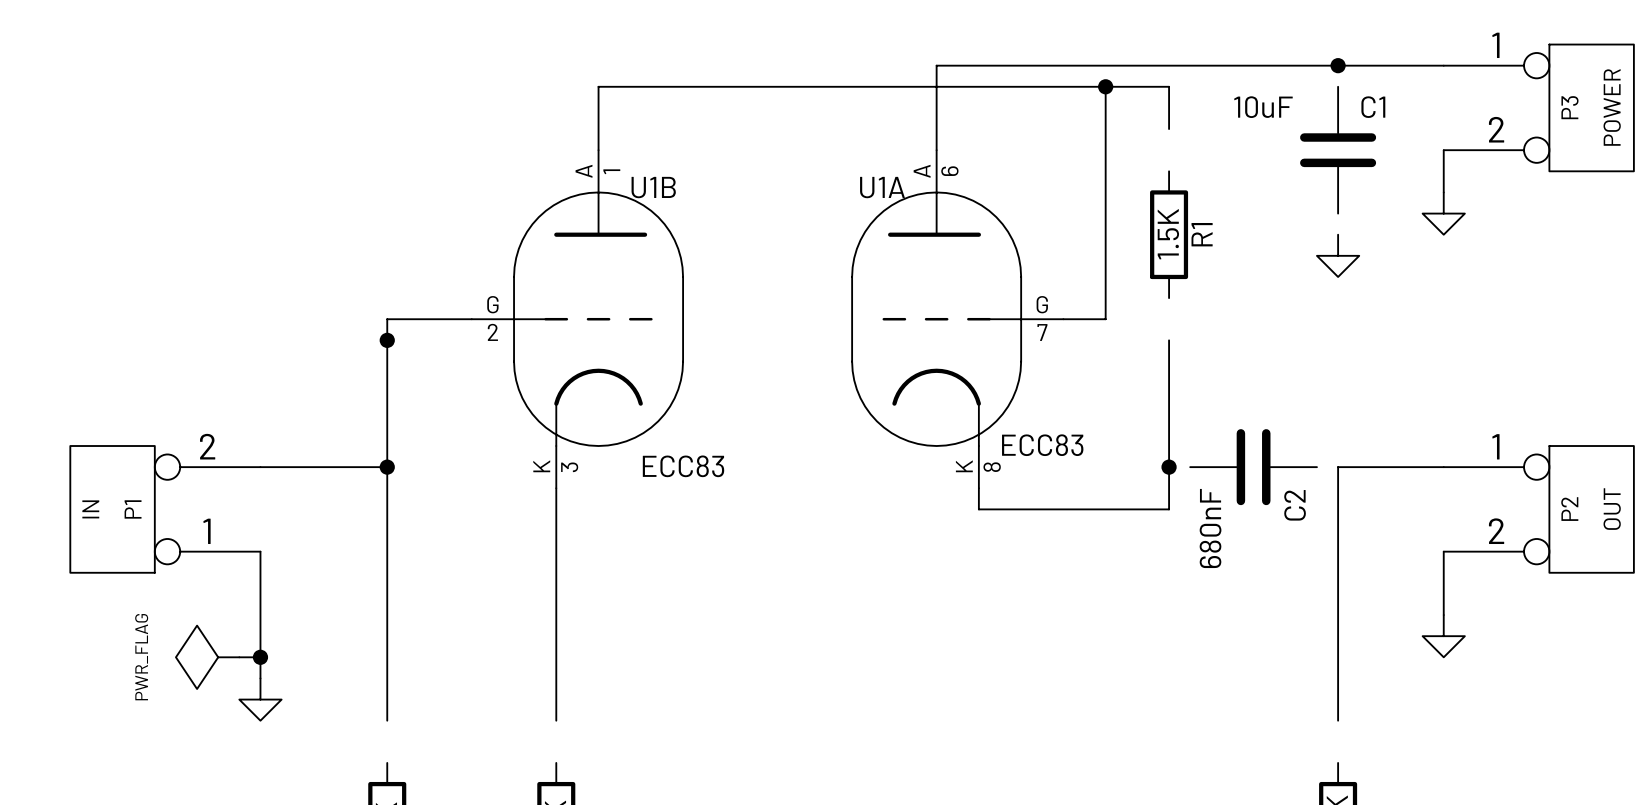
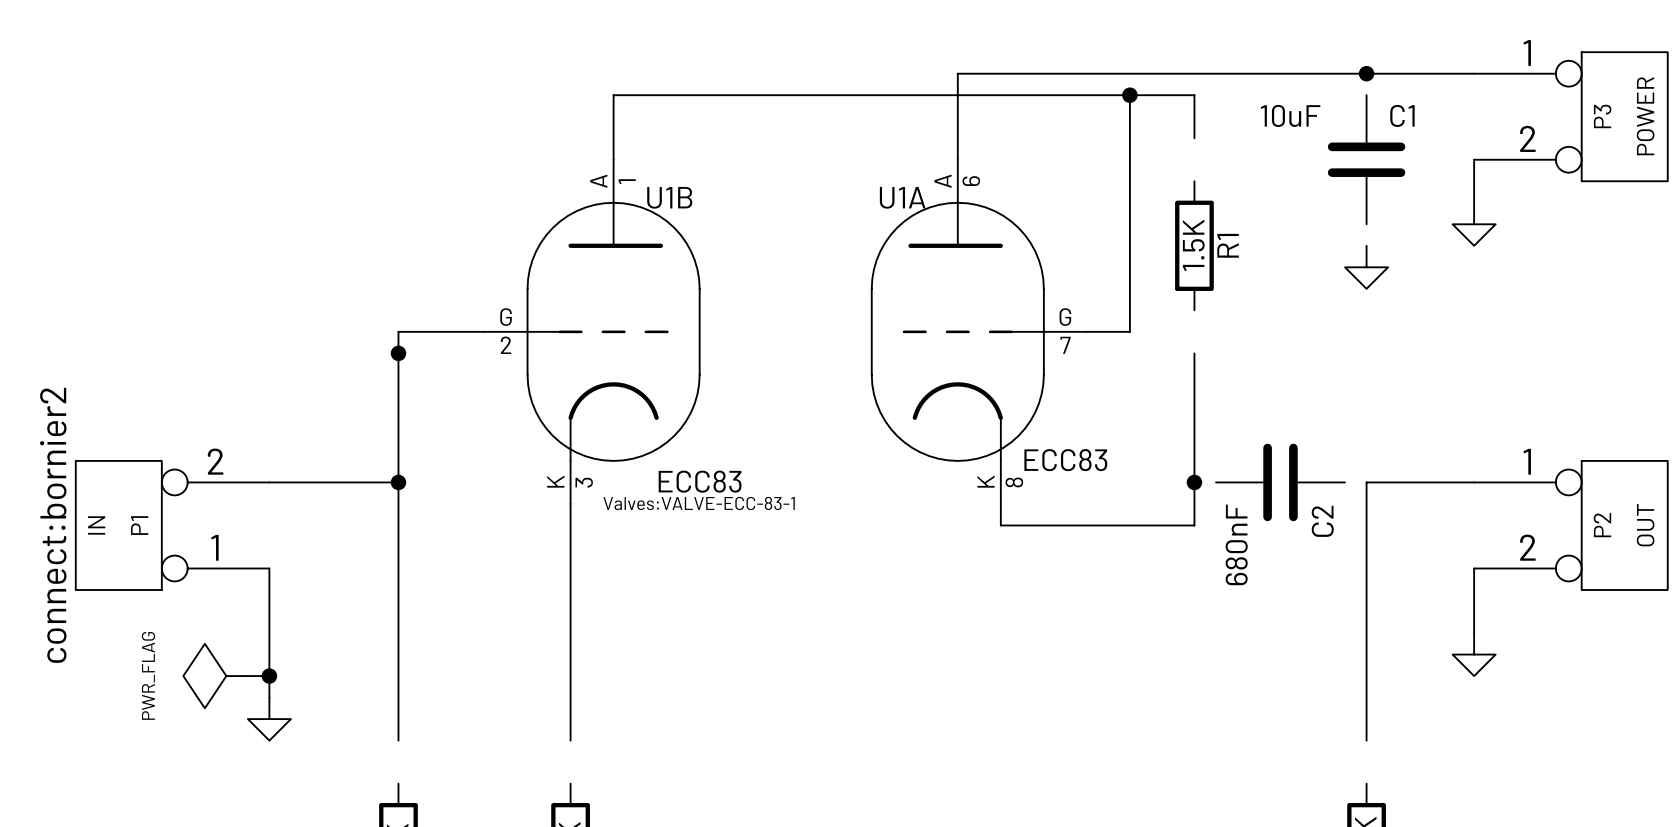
U1B text: none -> Valves:VALVE-ECC-83-1 (699, 503)
P1 text: none -> connect:bornier2 (53, 525)

